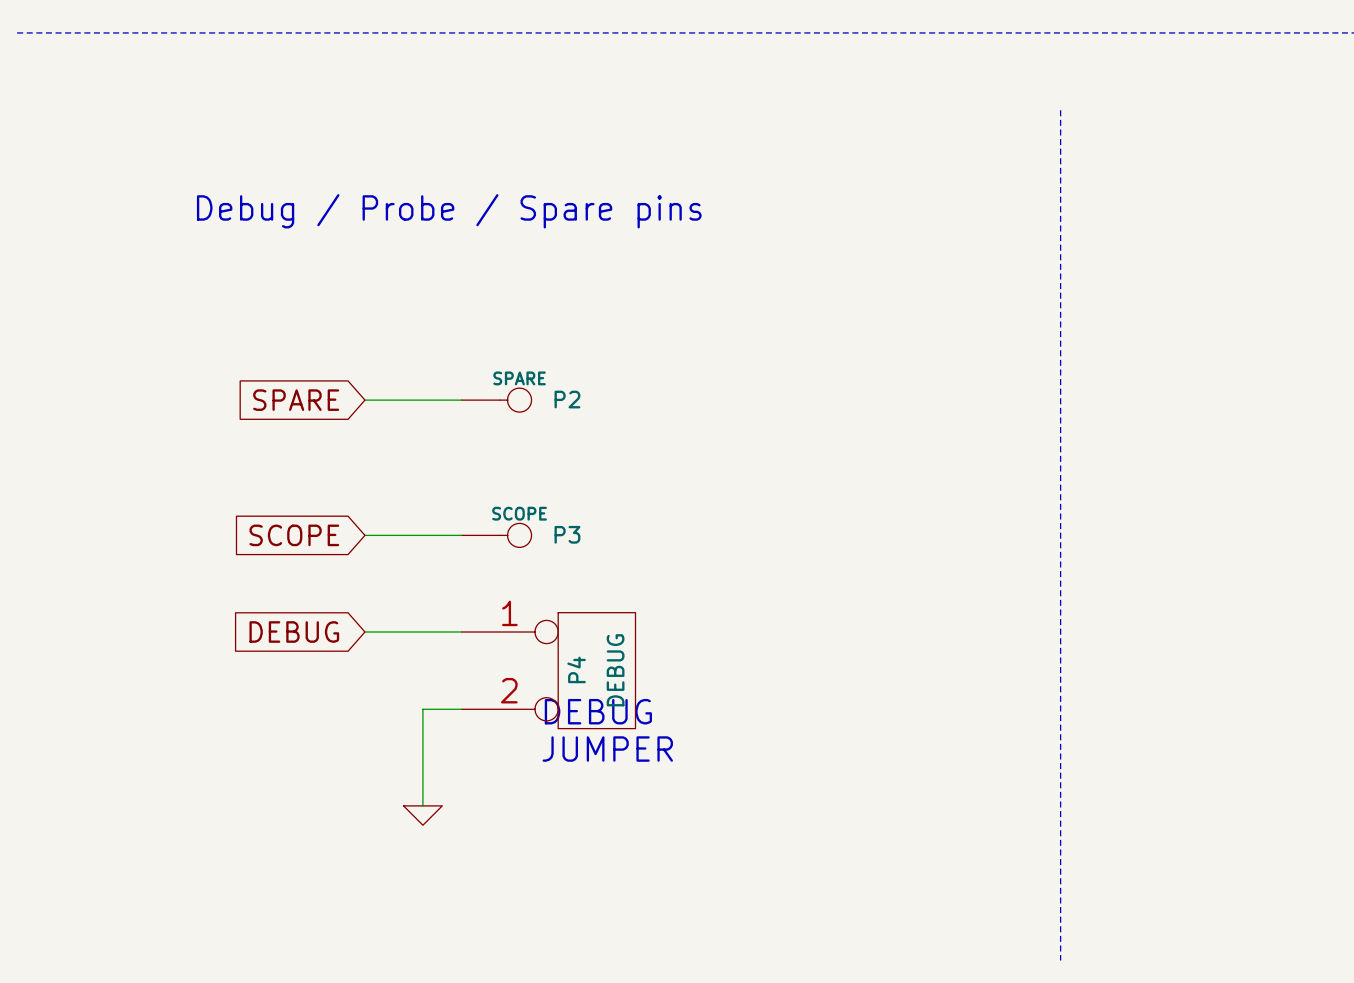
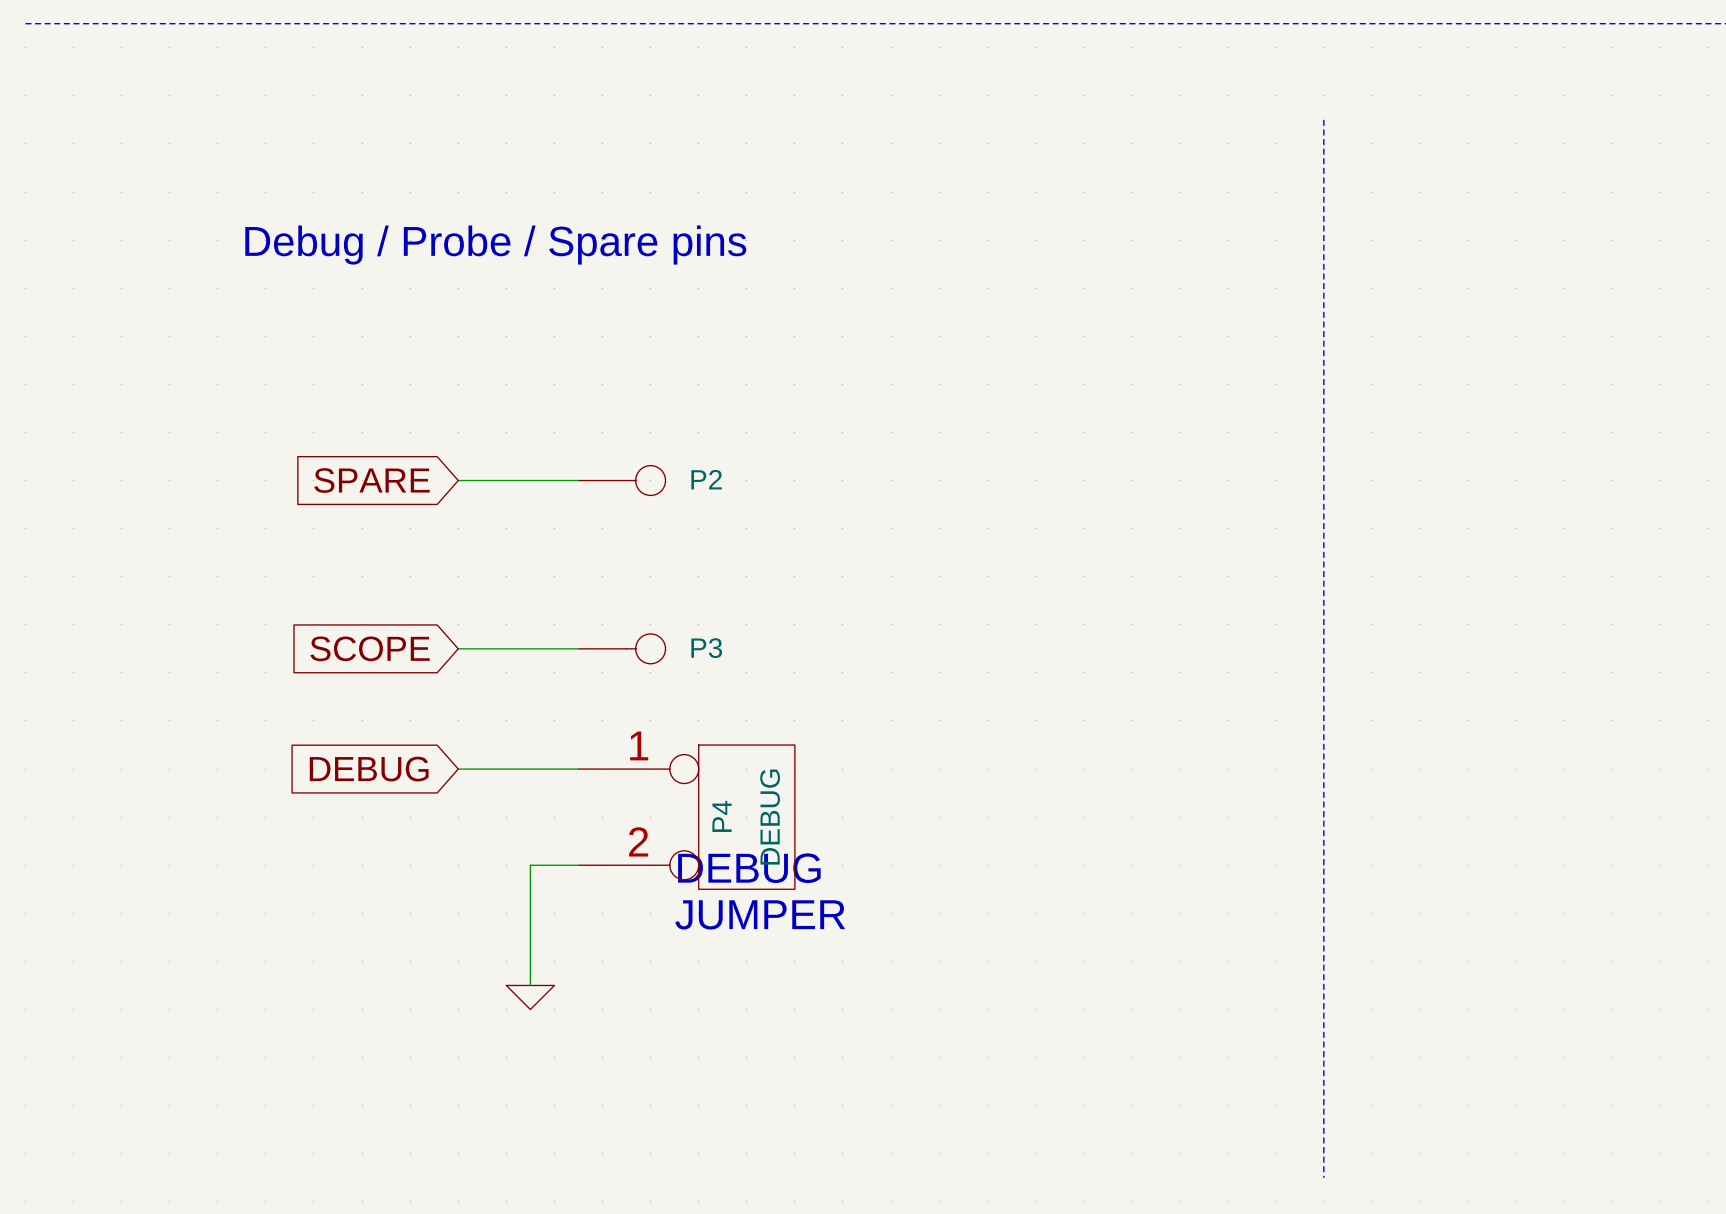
P2 value: SPARE (519, 378) -> none
P3 value: SCOPE (519, 513) -> none

